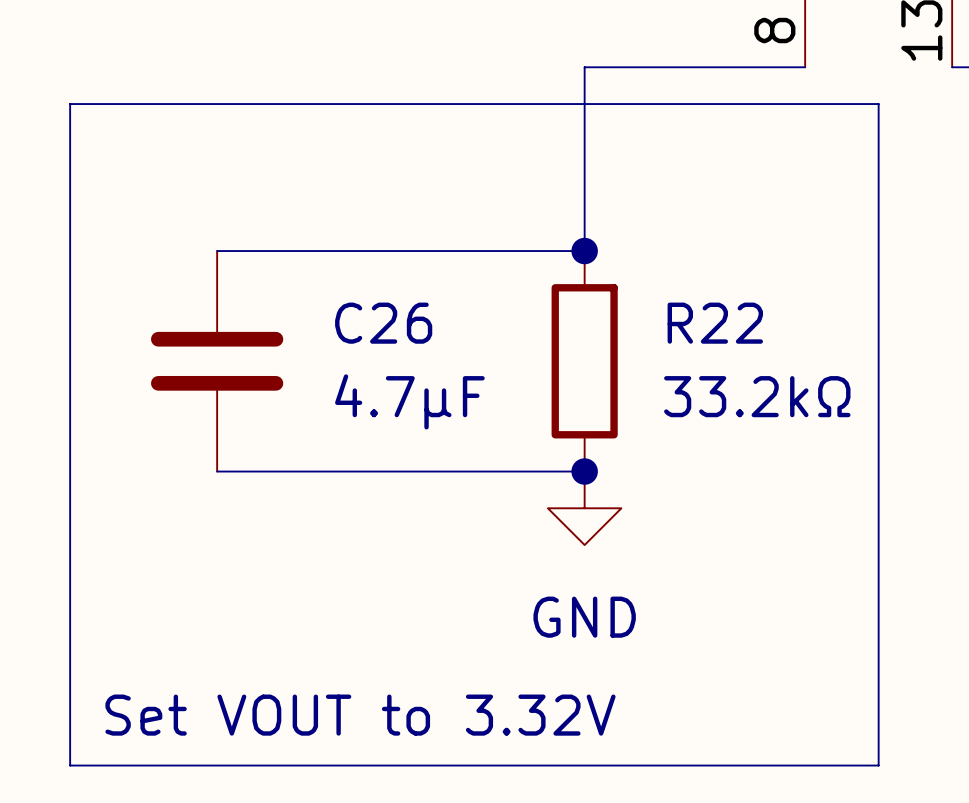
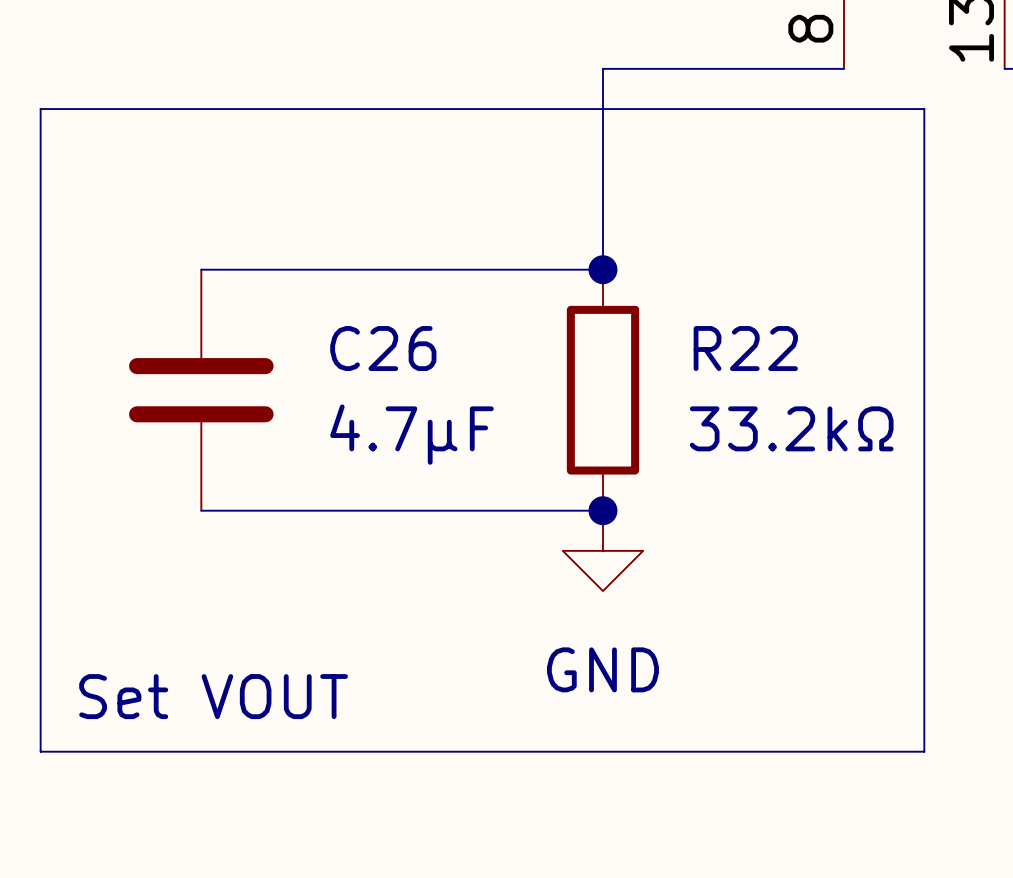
line: (70, 692) (70, 765) (878, 765) (878, 692) -> (40, 751) (924, 751)
text: Set VOUT to 3.32V (360, 715) -> Set VOUT (213, 696)

